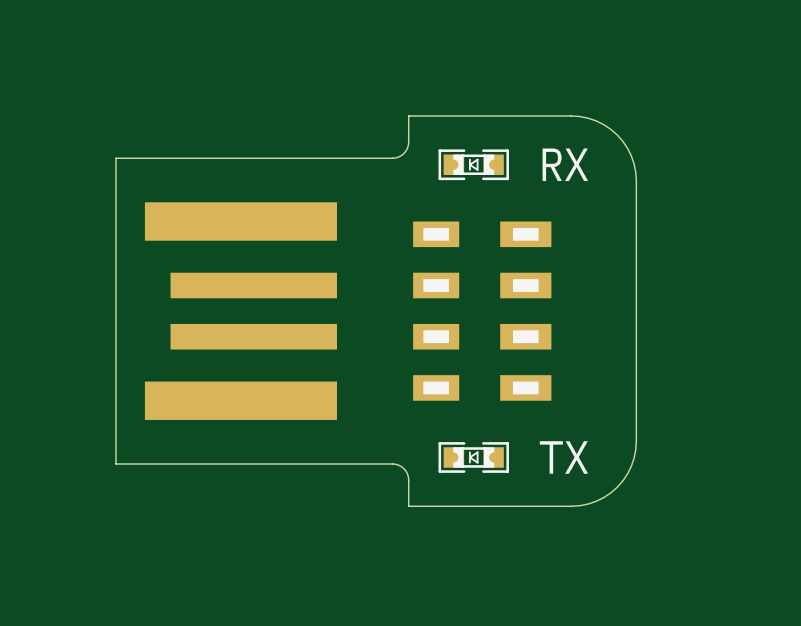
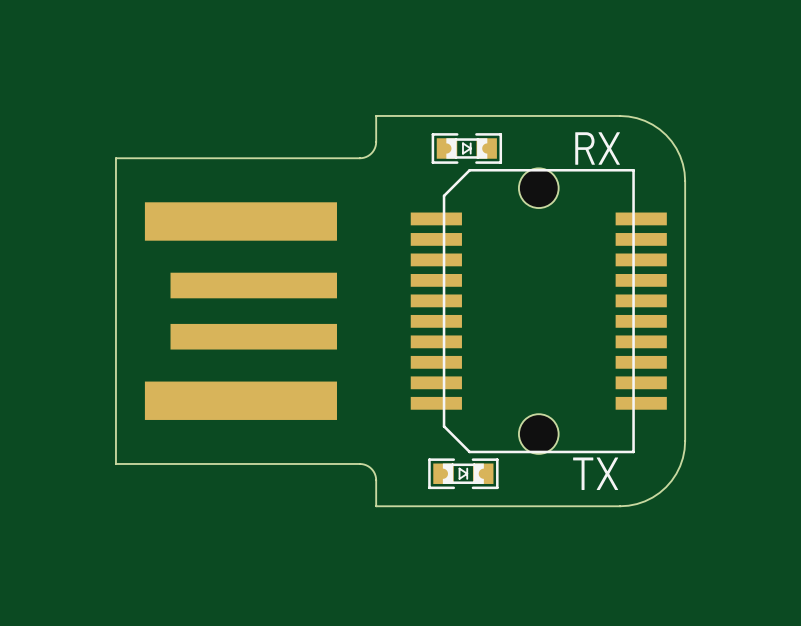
board edge: (408, 115) (408, 144) (402, 154) (394, 158) (359, 158) -> (408, 115) (376, 115) (374, 148) (369, 154) (359, 158)
board edge: (571, 115) (596, 120) (617, 135) (631, 156) (636, 181) (636, 441) (634, 458) (622, 480) (610, 492) (588, 504) (571, 506) -> (571, 115) (628, 116) (652, 124) (666, 135) (676, 148) (682, 164) (685, 181) (685, 441) (680, 466) (666, 487) (645, 501) (628, 505) (571, 506)
RX rotation: 0° (473, 164) -> 180° (466, 148)
part: (482, 311) -> none
part: none -> (538, 311)
TX rotation: 0° (473, 457) -> 180° (463, 473)
board edge: (359, 463) (394, 464) (402, 467) (408, 478) (408, 506) -> (359, 463) (369, 467) (374, 474) (376, 506) (408, 506)

